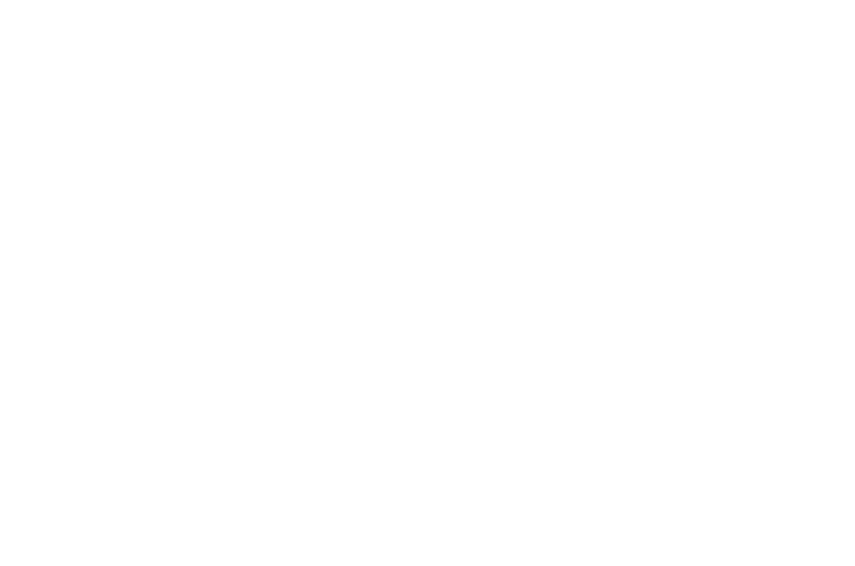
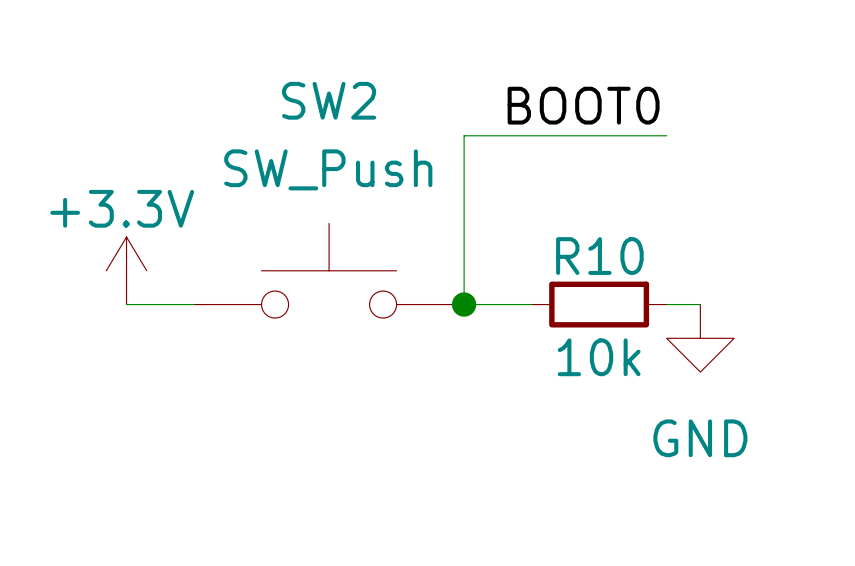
label: none -> BOOT0 (583, 105)
wire: none -> (666, 135) (464, 135) (464, 304) (531, 304)
power symbol: none -> +3.3V (126, 270)
SW2: none -> SW_Push (329, 270)
wire: none -> (126, 304) (194, 304)
junction: none -> (464, 304)
R10: none -> 10k (599, 304)
wire: none -> (666, 304) (700, 304)
power symbol: none -> GND (700, 338)

